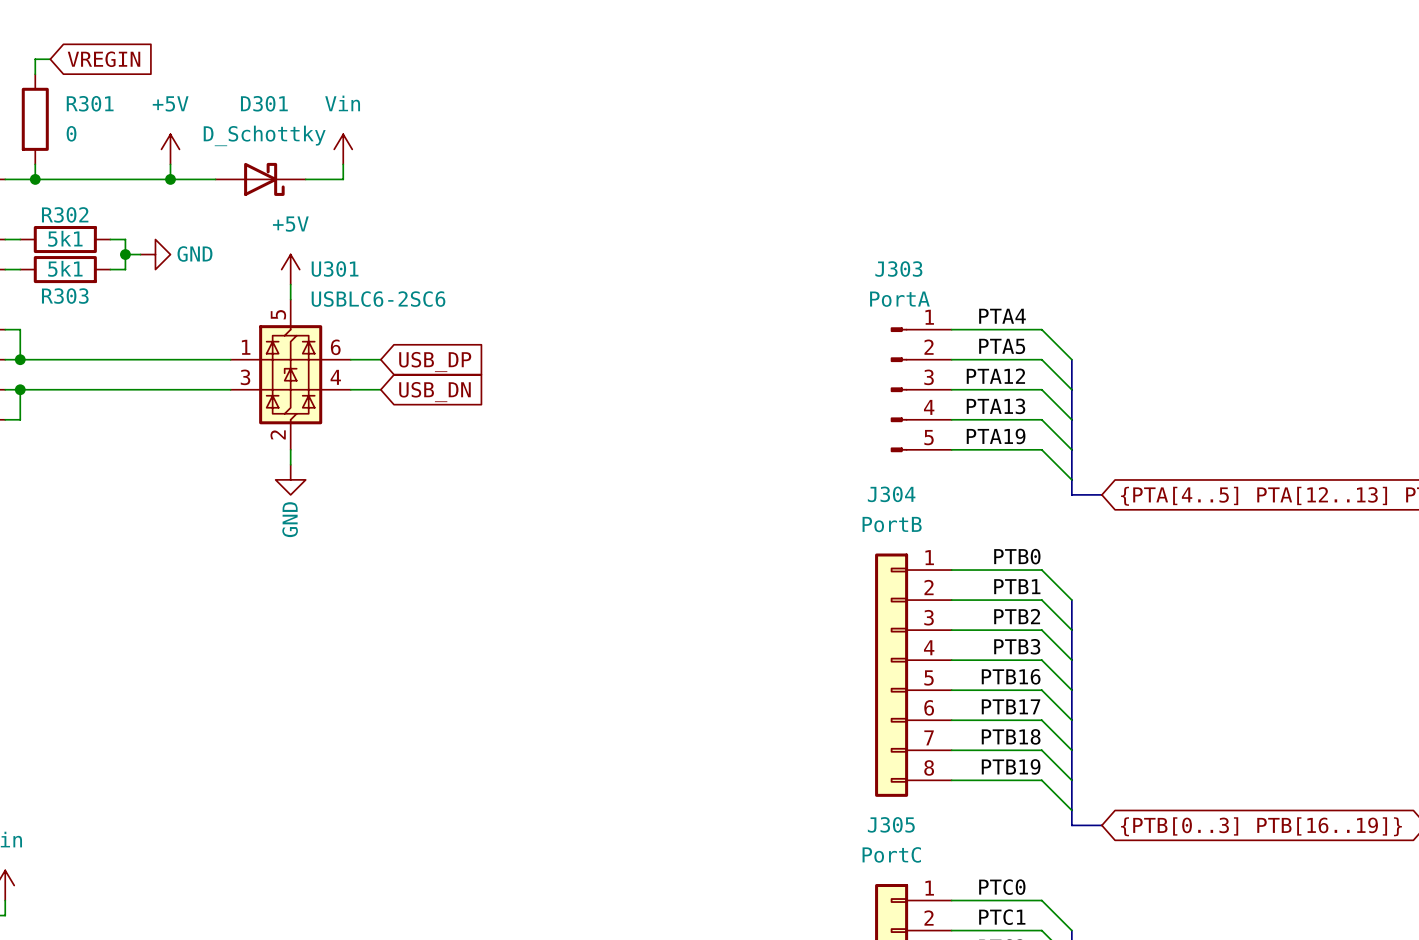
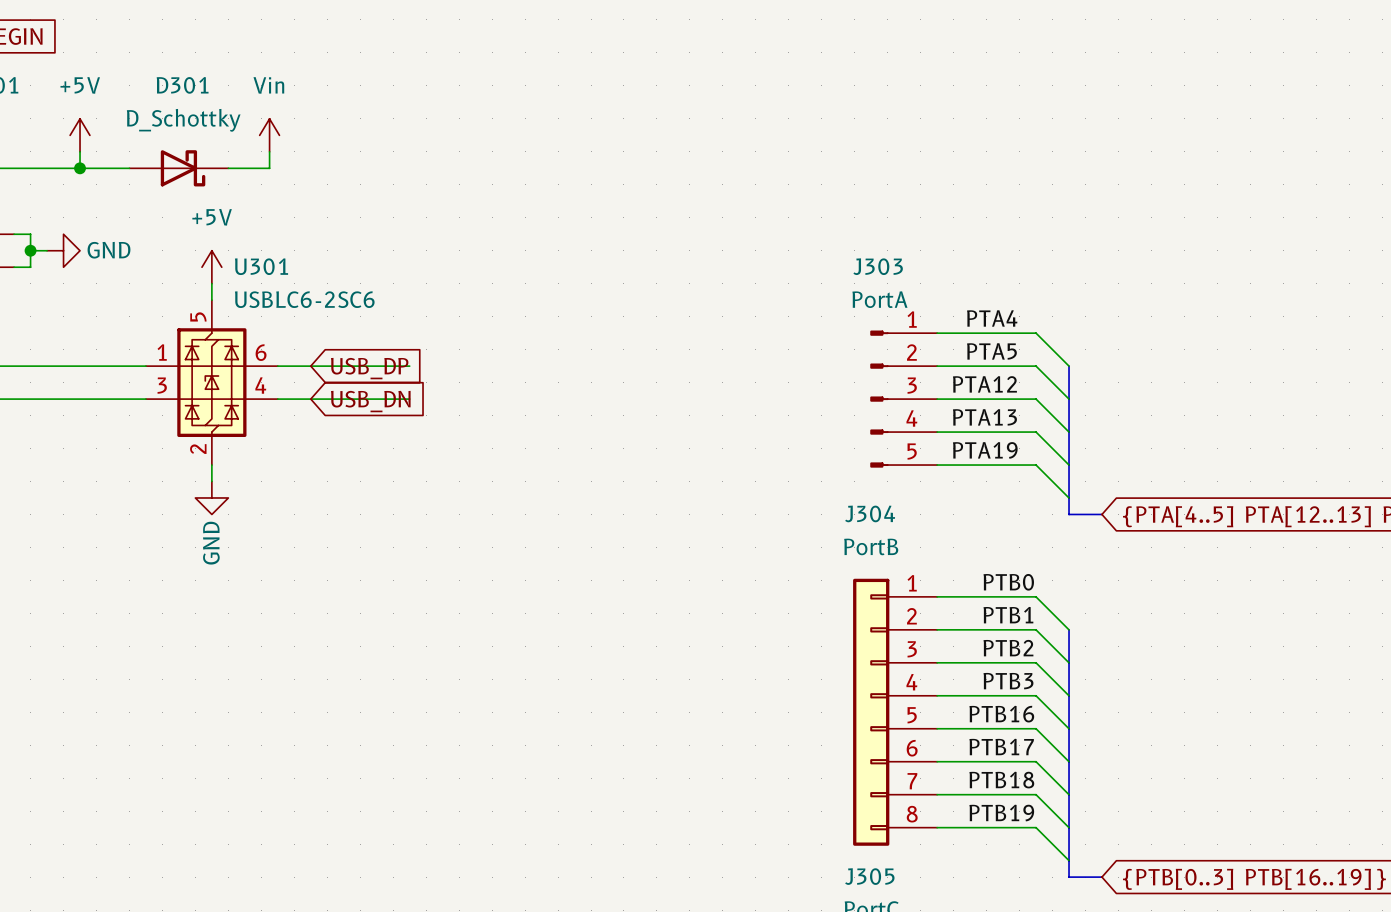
wire: none -> (310, 366) (409, 366)
wire: none -> (310, 399) (409, 399)

